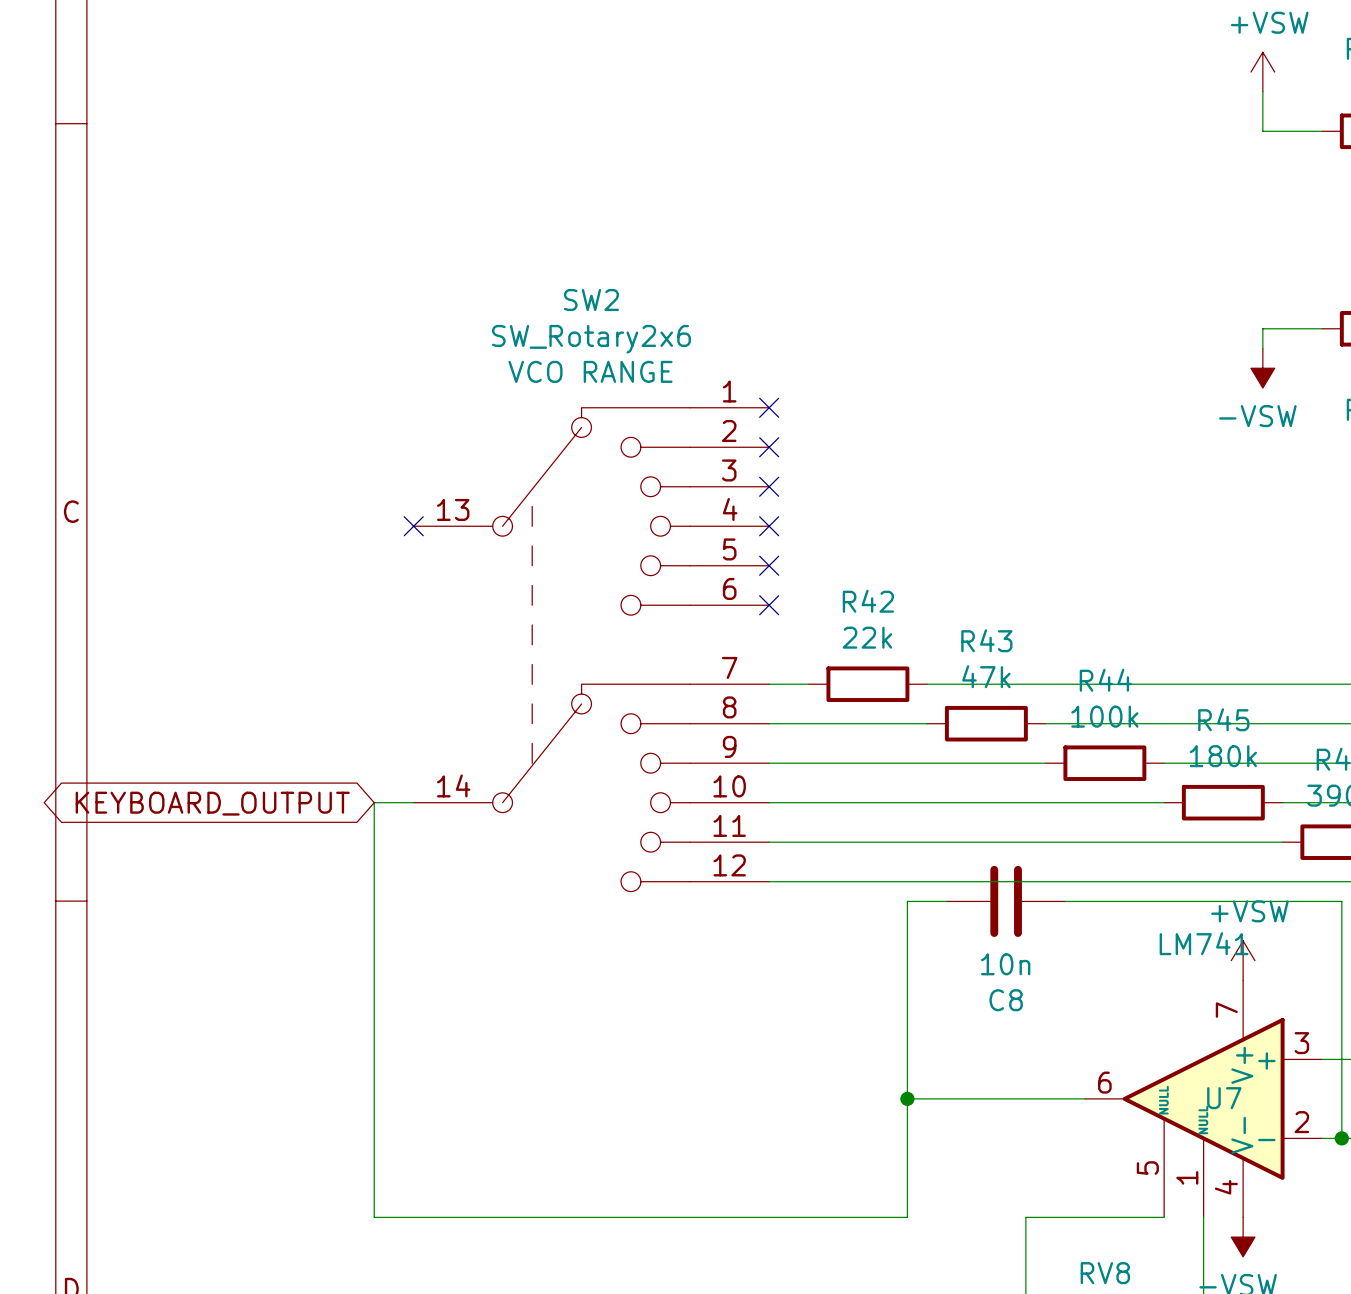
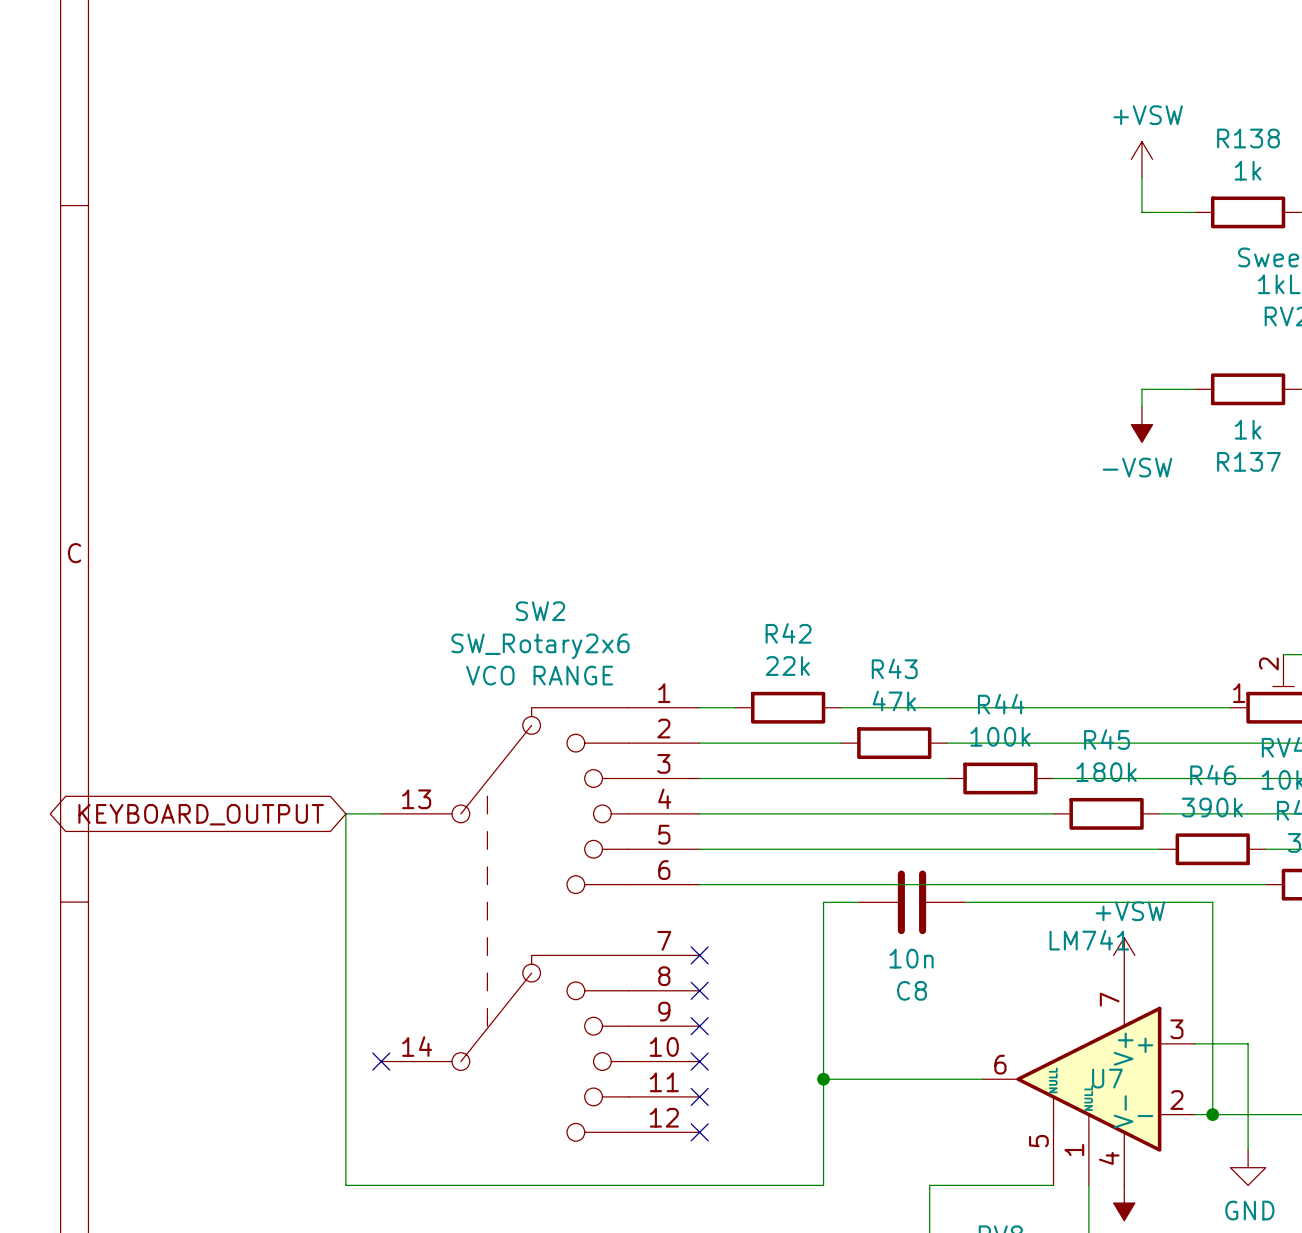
no-connect mark: (769, 407) -> none
no-connect mark: (769, 447) -> none
no-connect mark: (769, 486) -> none
no-connect mark: (413, 526) -> none
no-connect mark: (769, 526) -> none
no-connect mark: (769, 565) -> none
no-connect mark: (769, 605) -> none
SW2 position: (591, 649) -> (540, 924)
no-connect mark: none -> (699, 955)
no-connect mark: none -> (699, 990)
no-connect mark: none -> (699, 1026)
no-connect mark: none -> (381, 1061)
no-connect mark: none -> (699, 1061)
no-connect mark: none -> (699, 1096)
no-connect mark: none -> (699, 1132)

